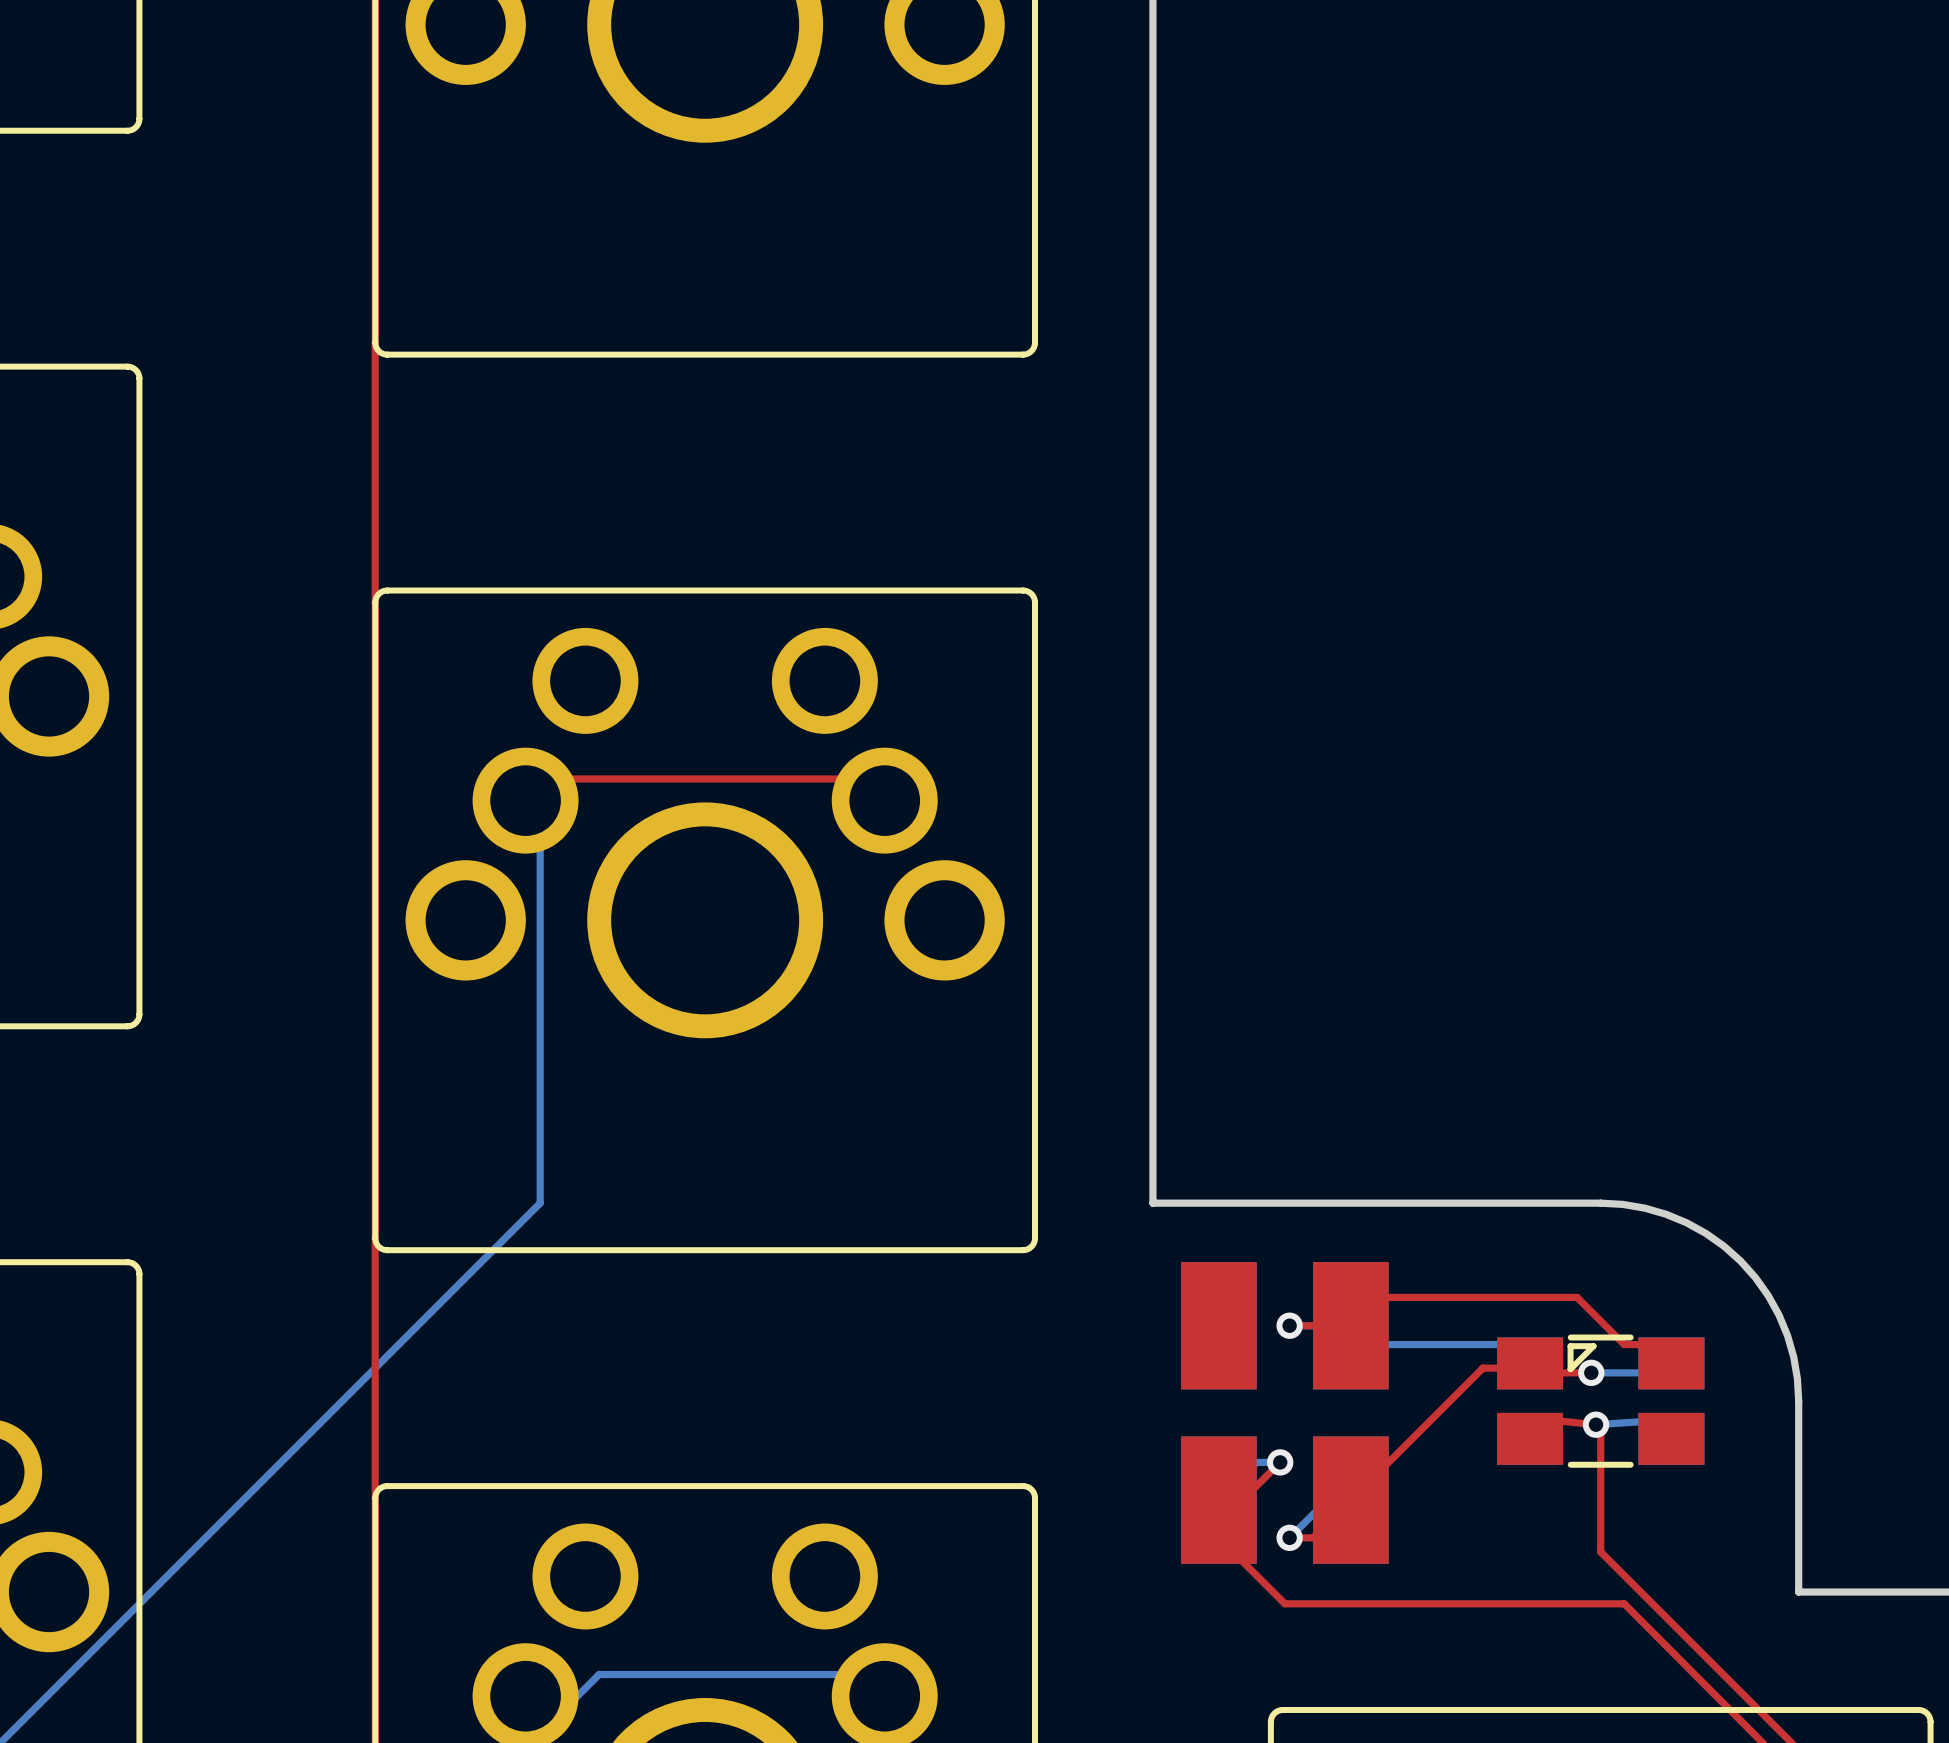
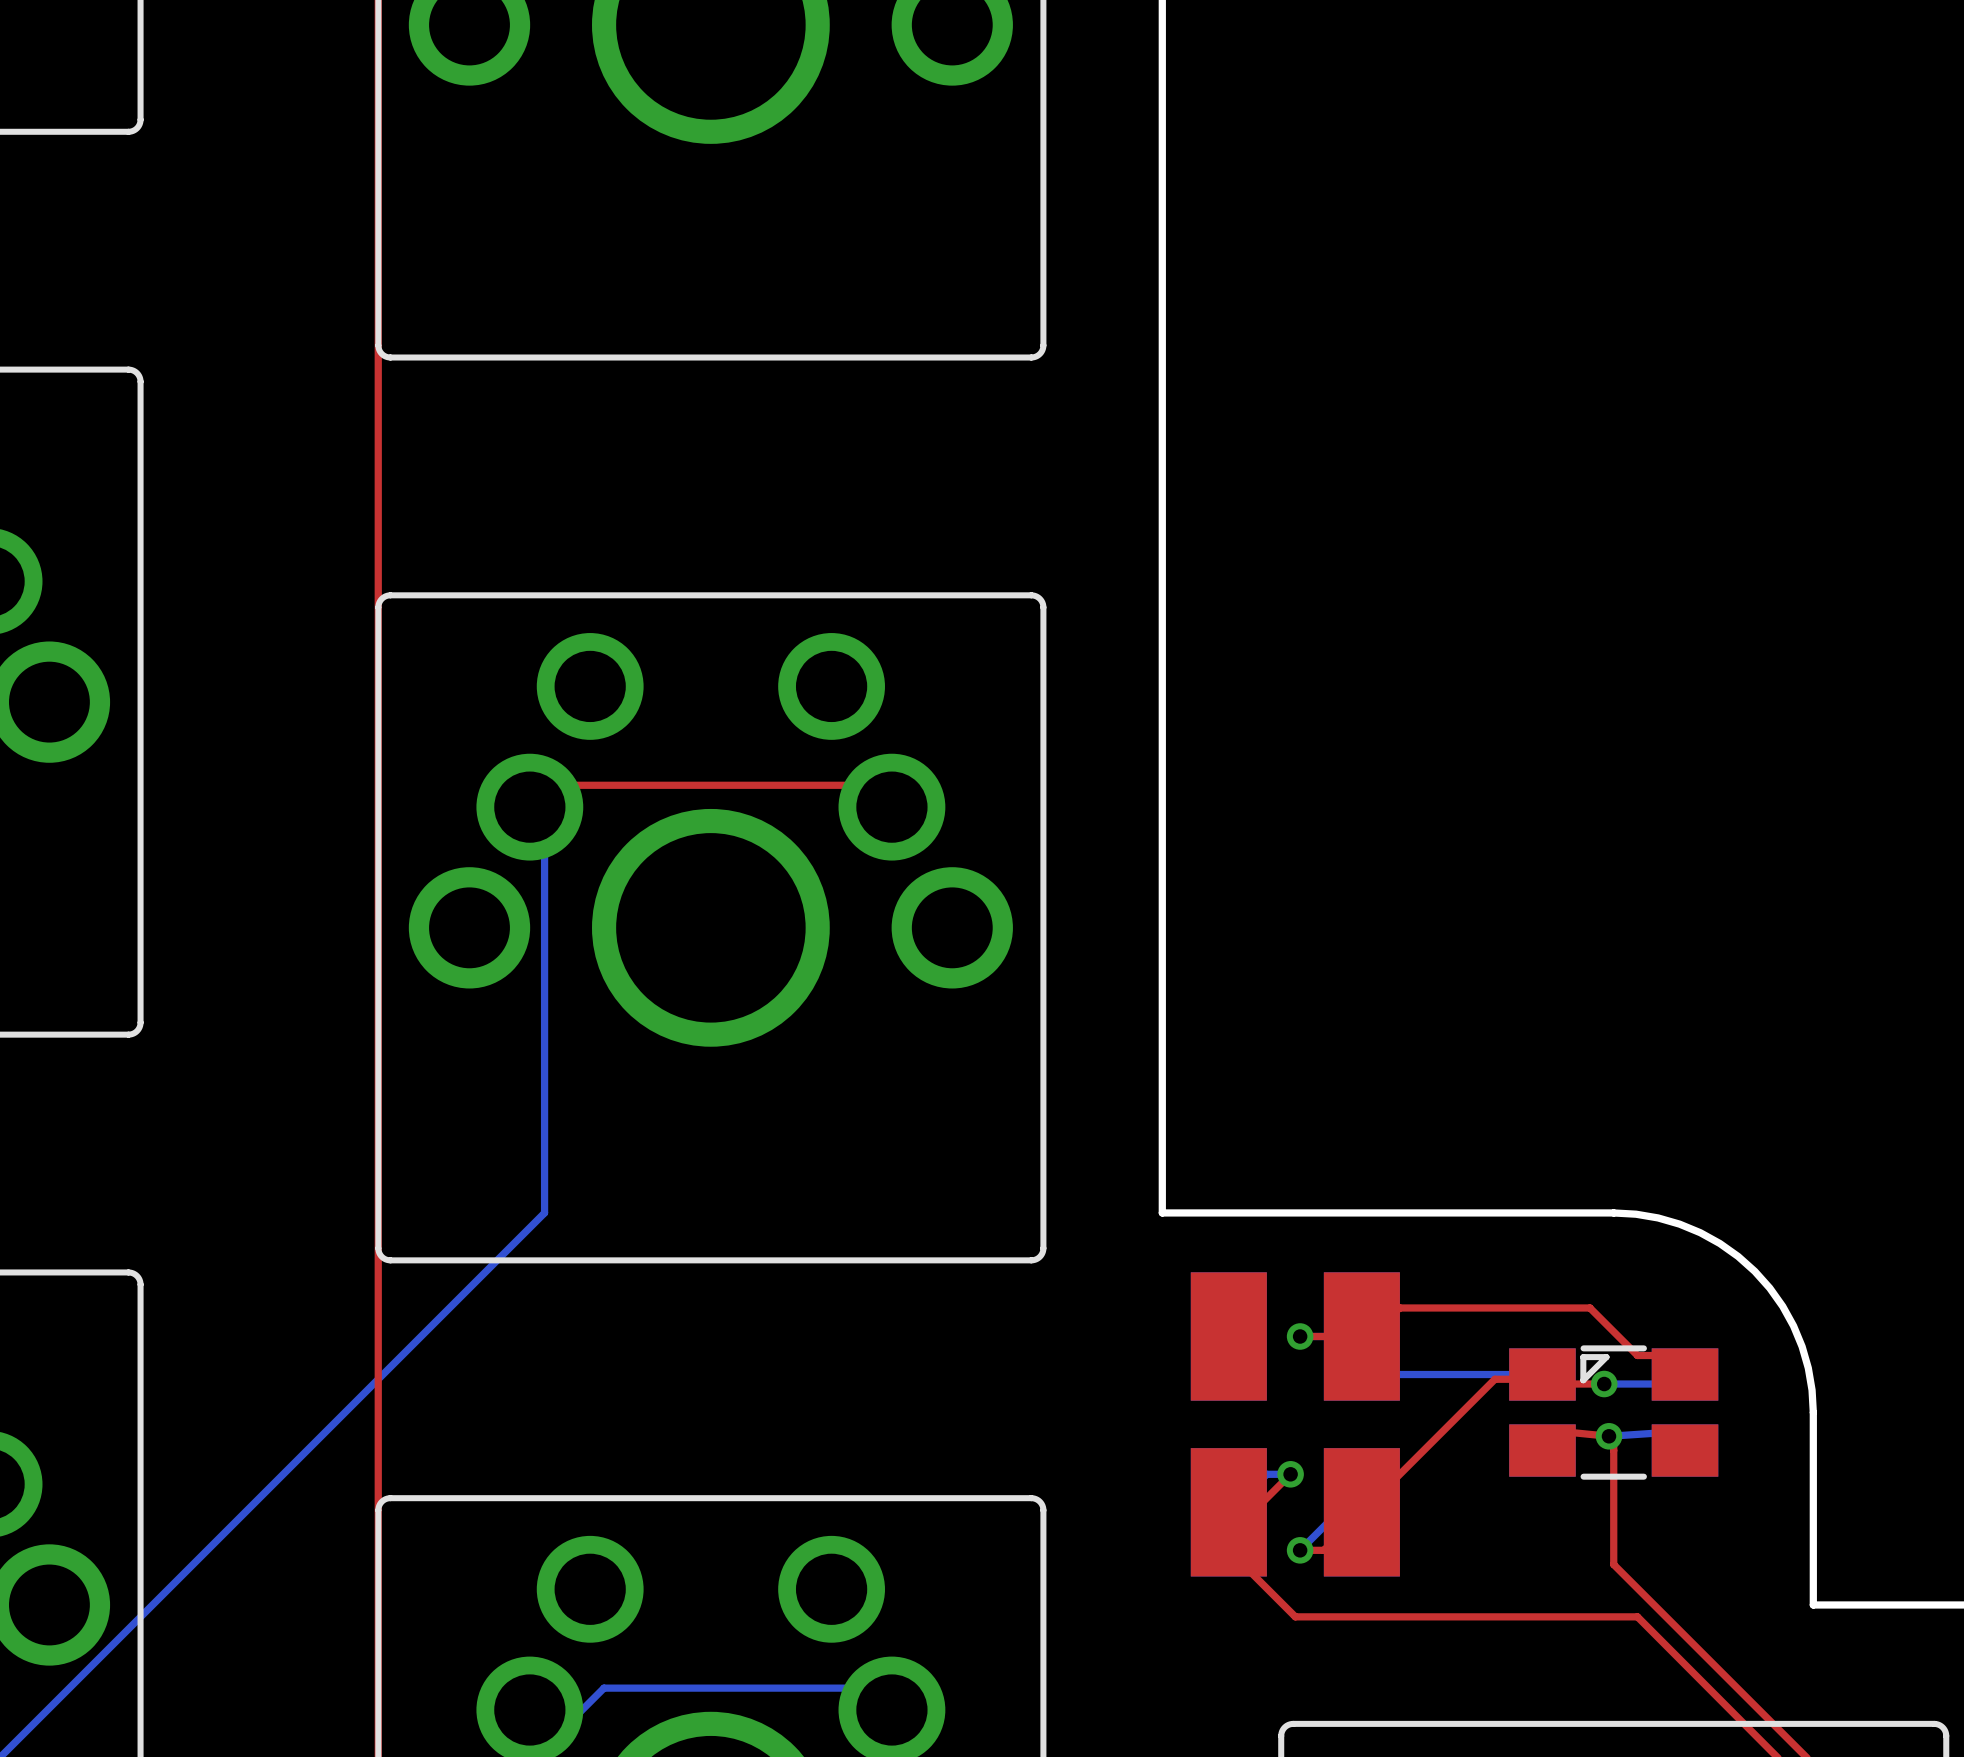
bottom track: (1350, 1325) (1341, 1344) (1530, 1344) (1530, 1363) -> (1361, 1336) (1395, 1374) (1542, 1374)

